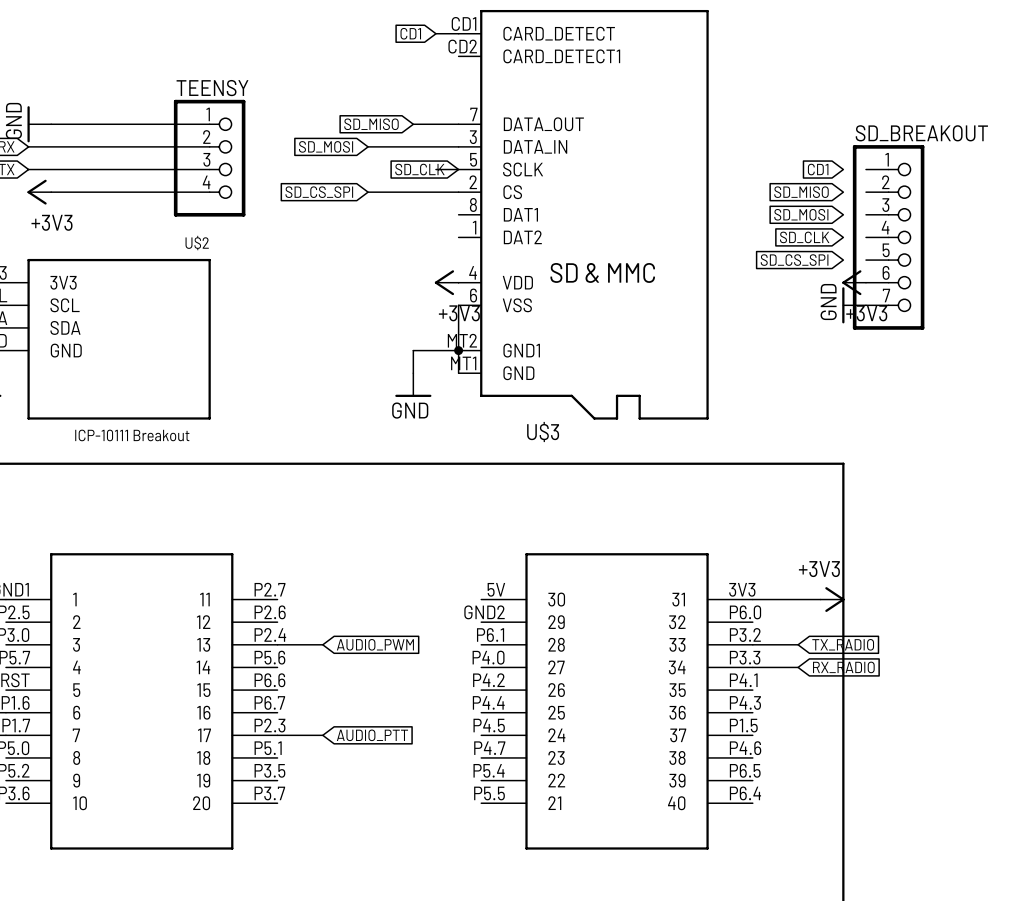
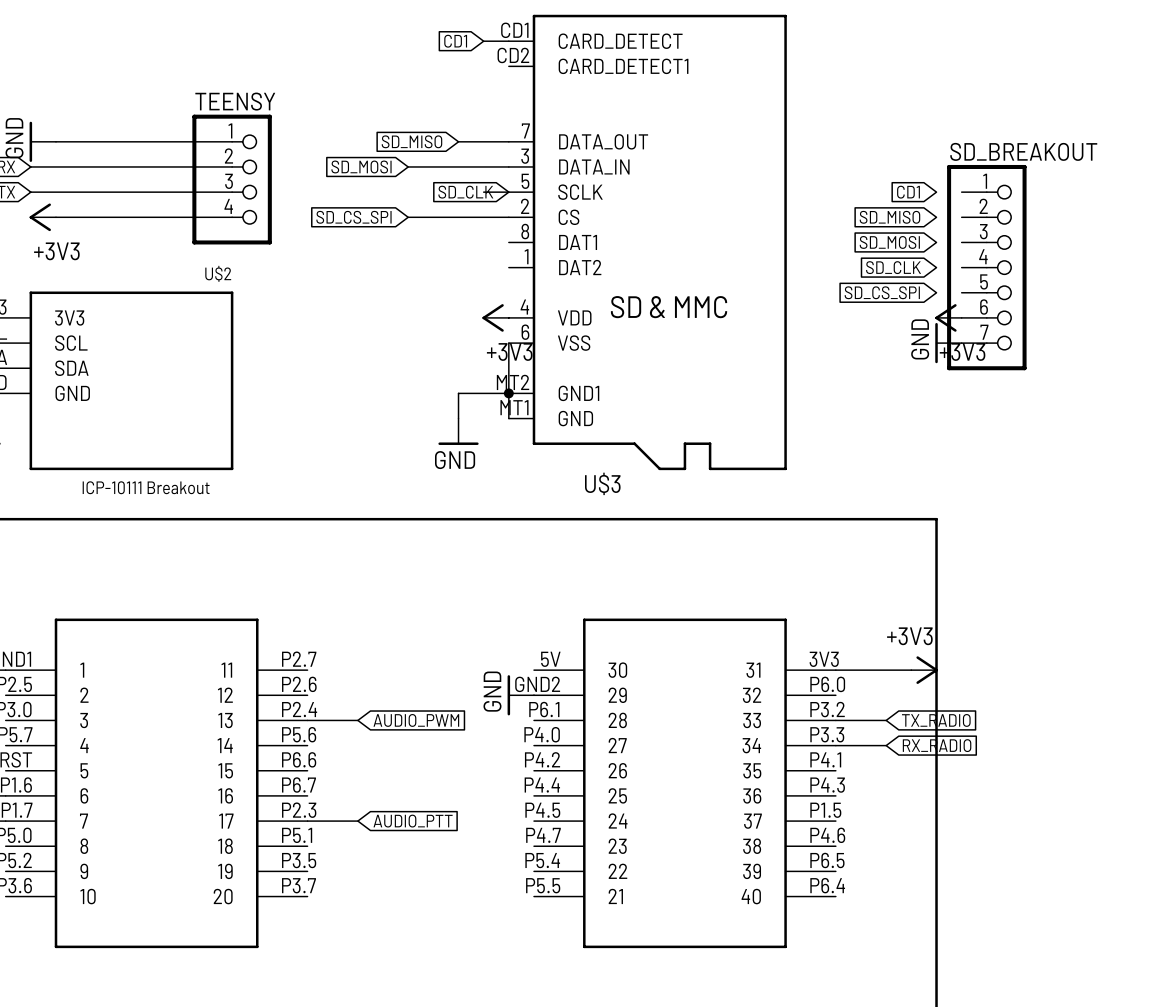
power symbol: none -> GND (520, 695)

